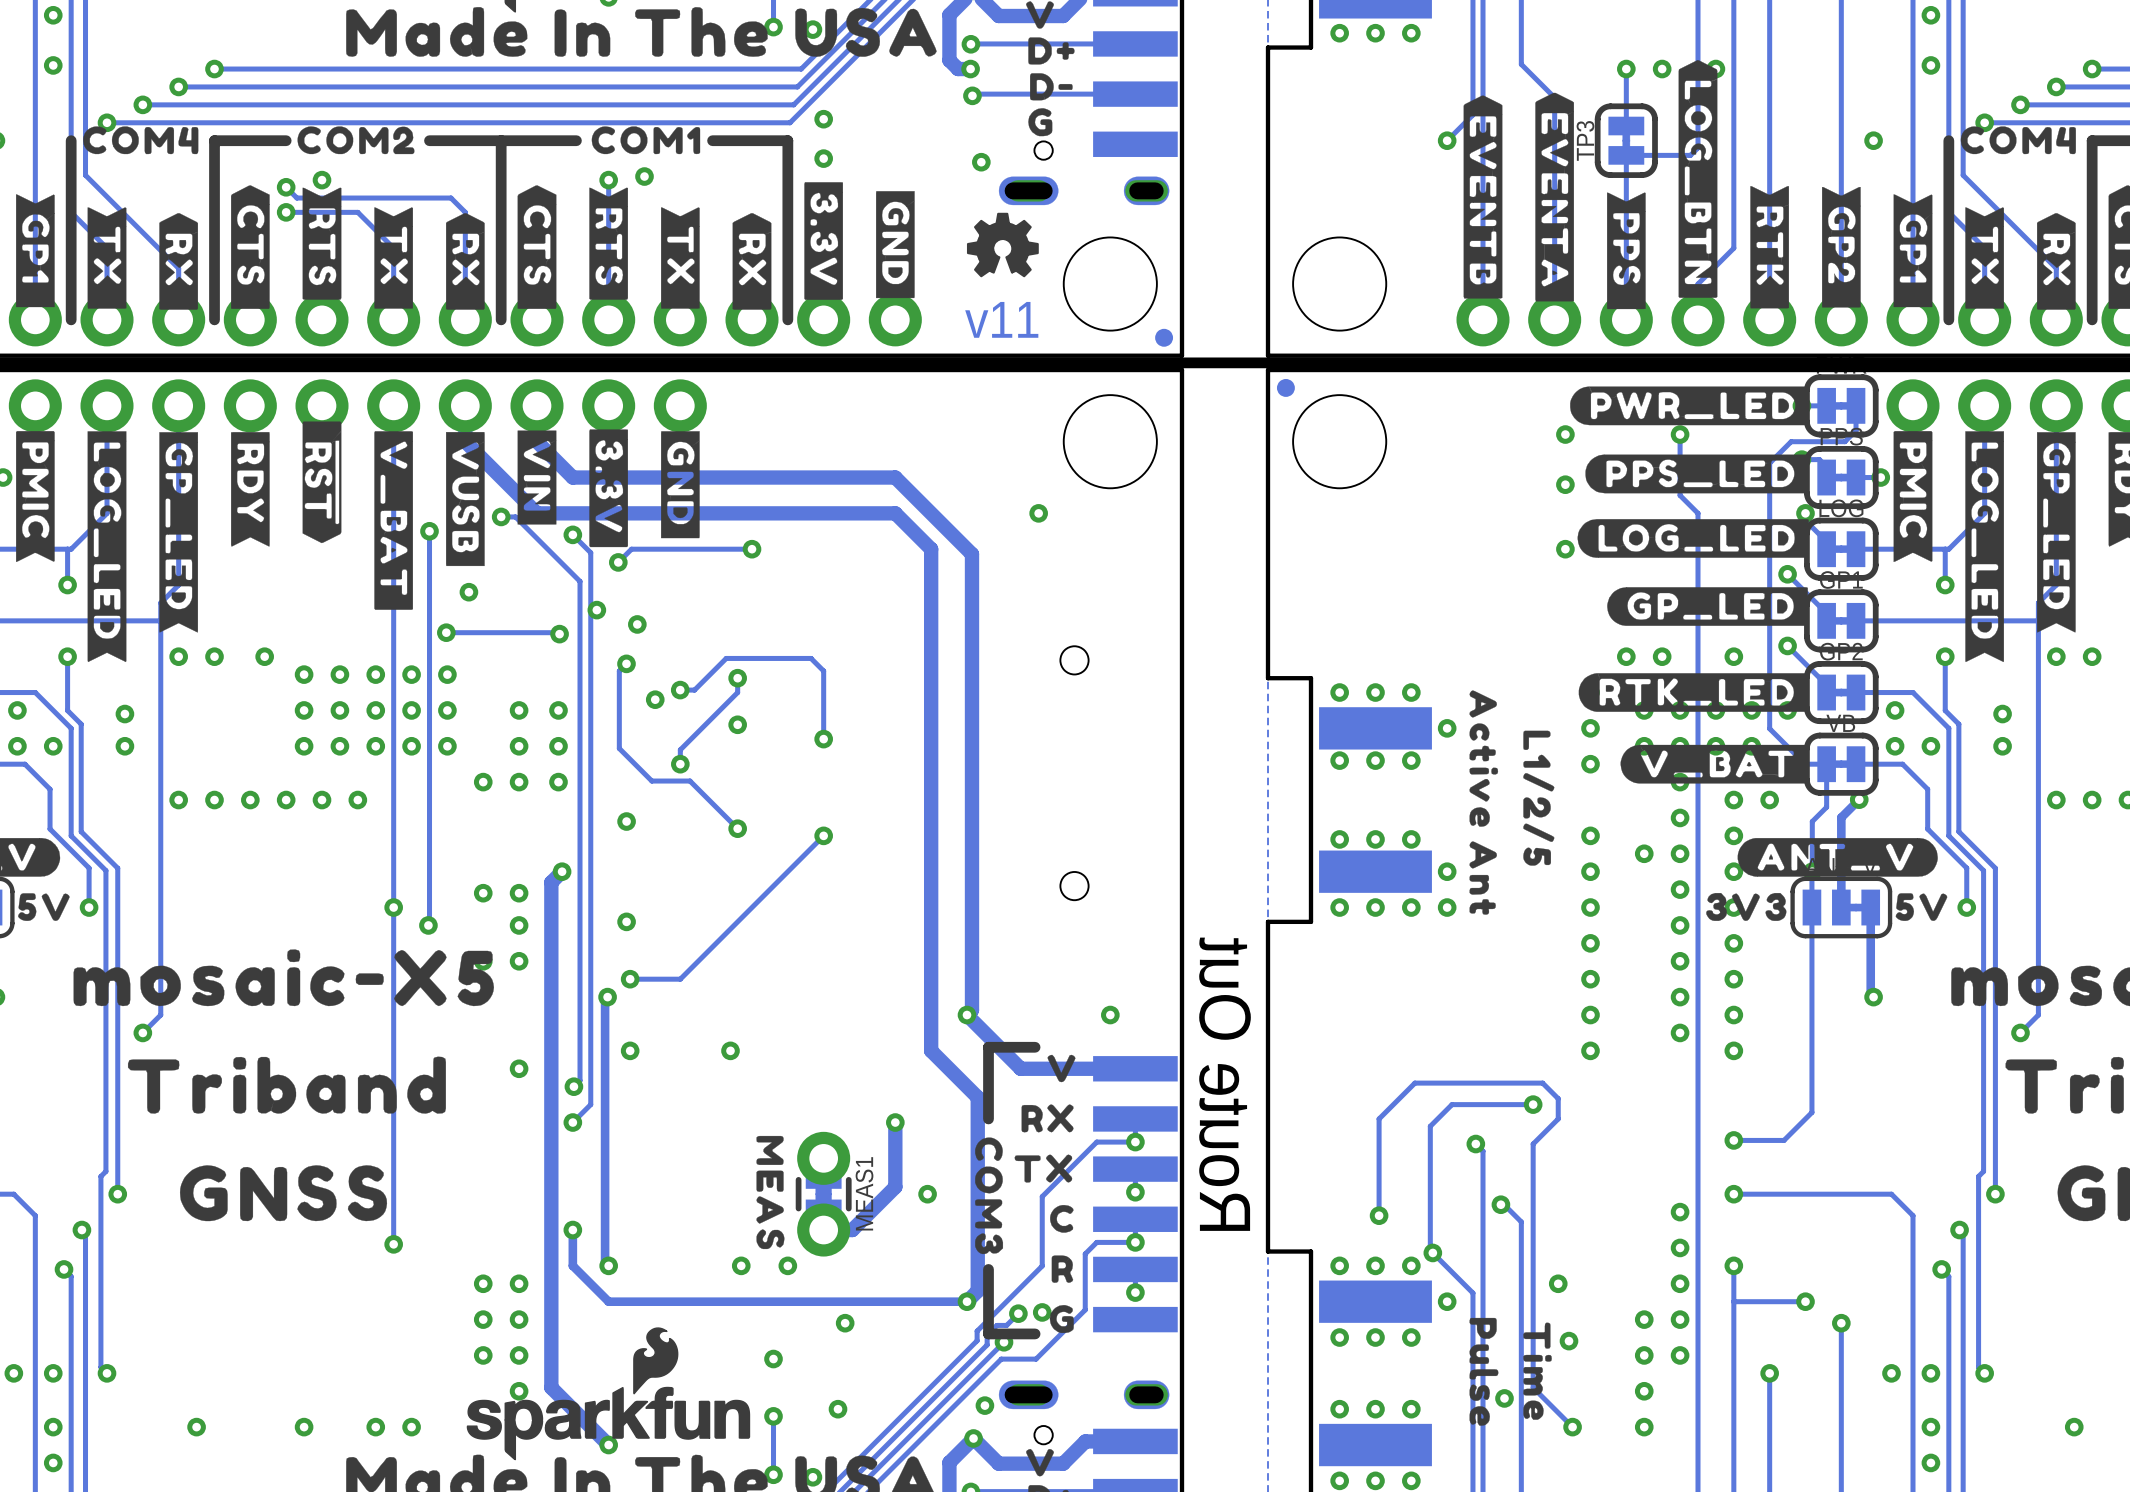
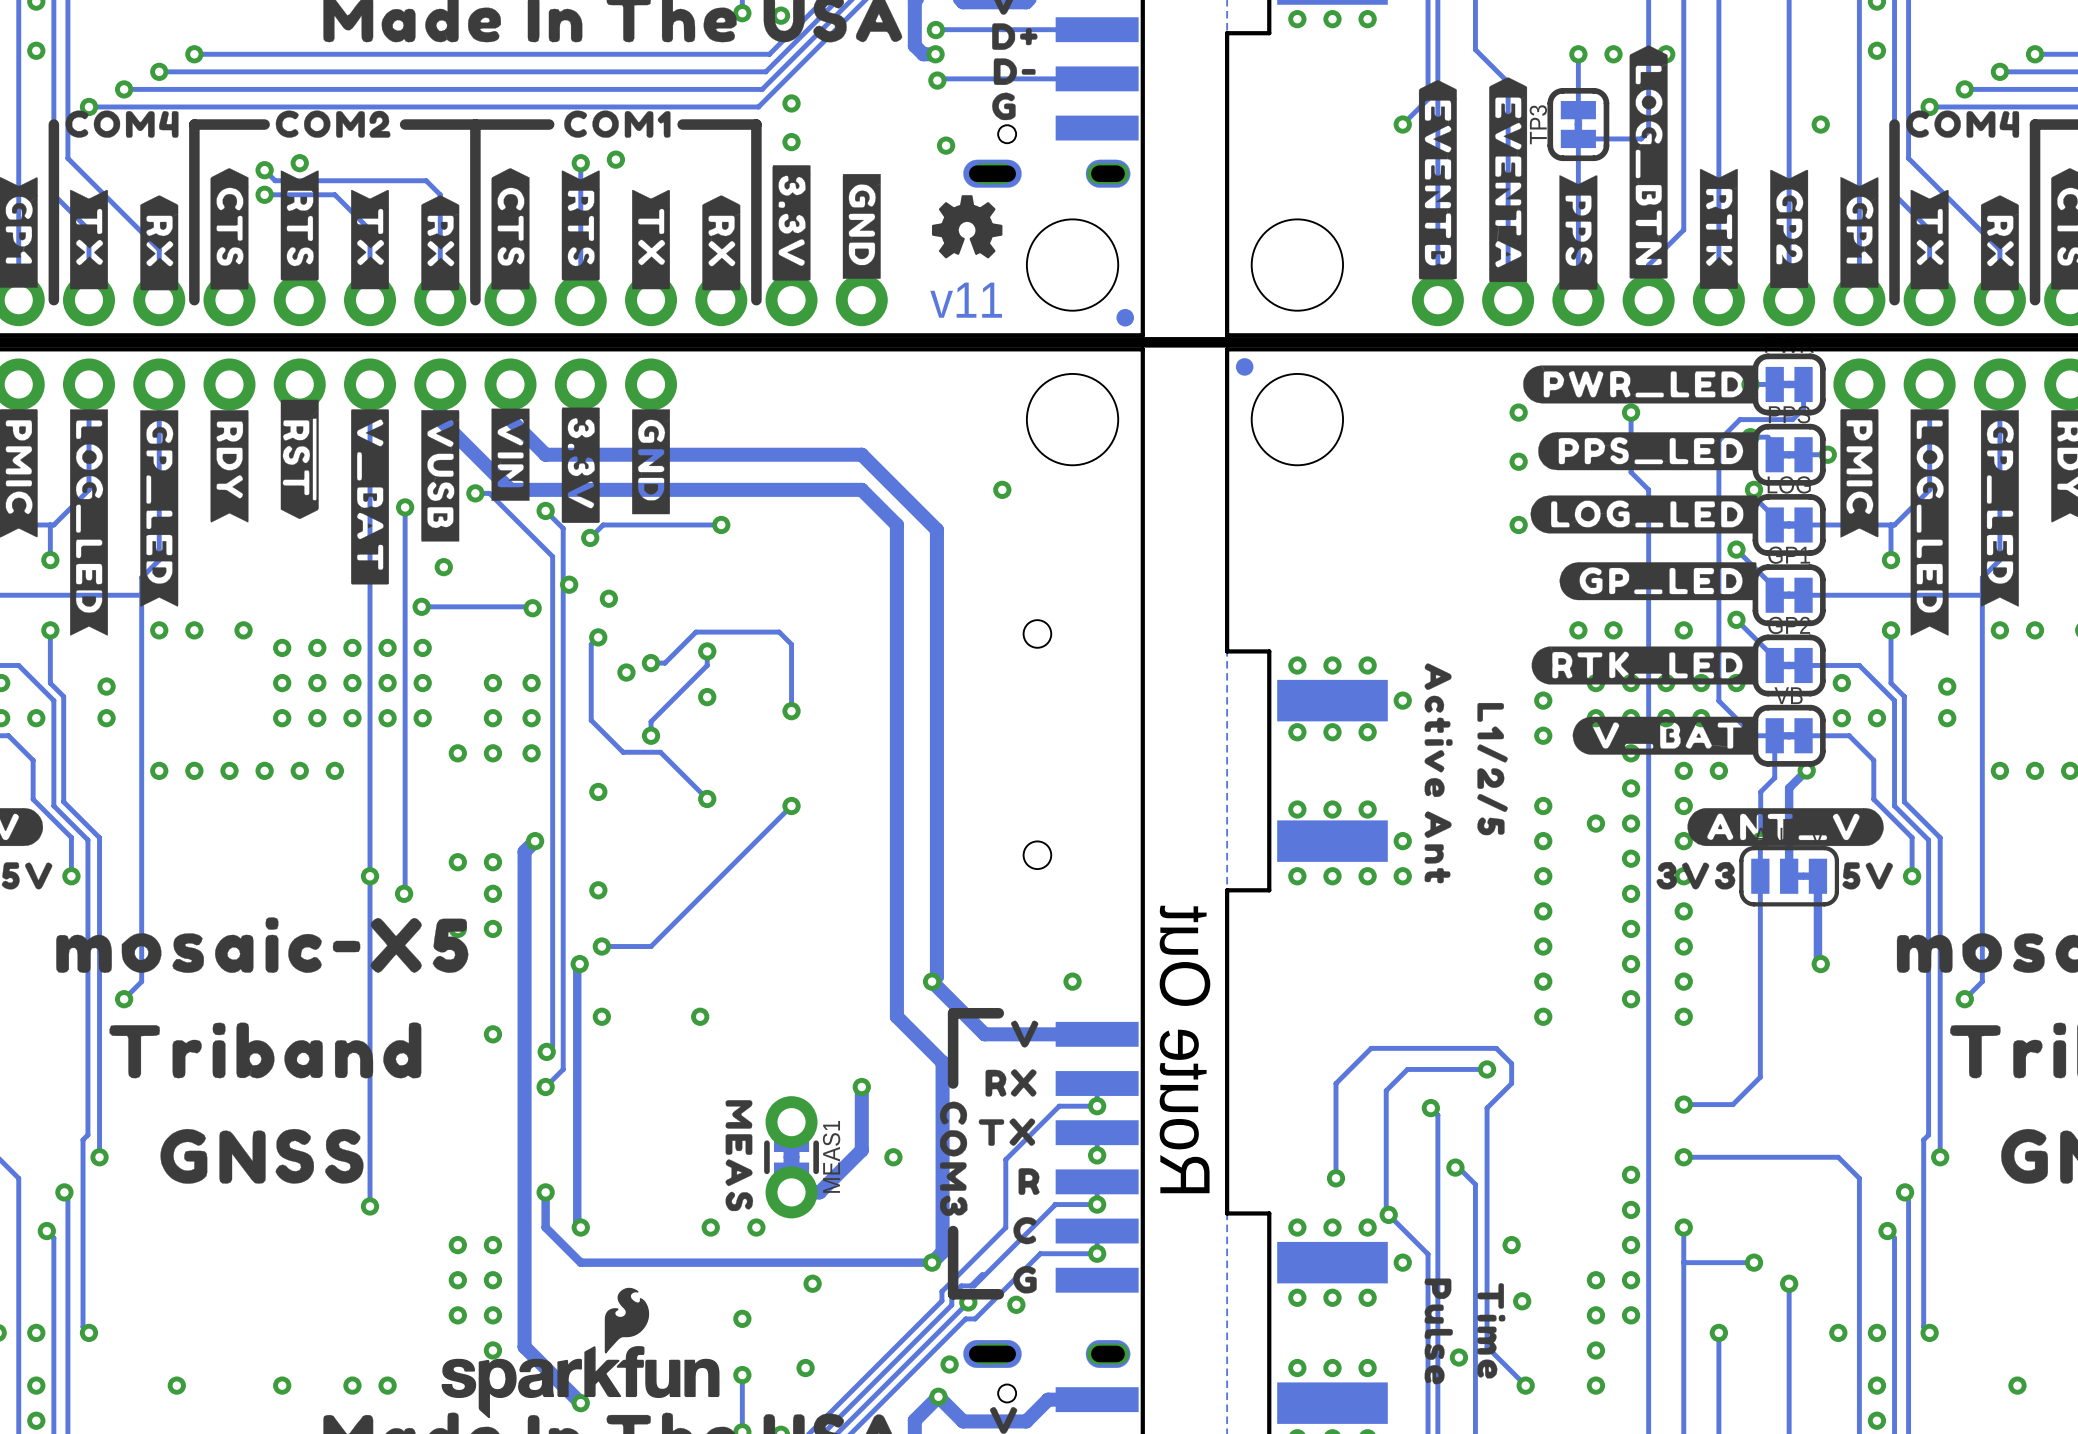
drawing position: (1061, 1218) -> (1024, 1230)
track: (1096, 1242) (1085, 1253) (1085, 1309) (1036, 1359) (1010, 1359) -> (1059, 1204) (1054, 1204) (974, 1285) (970, 1285)
drawing position: (1062, 1269) -> (1029, 1181)
track: none -> (1097, 1253) (1040, 1253) (975, 1318)
via: (1042, 1312) -> none
via: (1018, 1313) -> none
via: none -> (1016, 1304)

